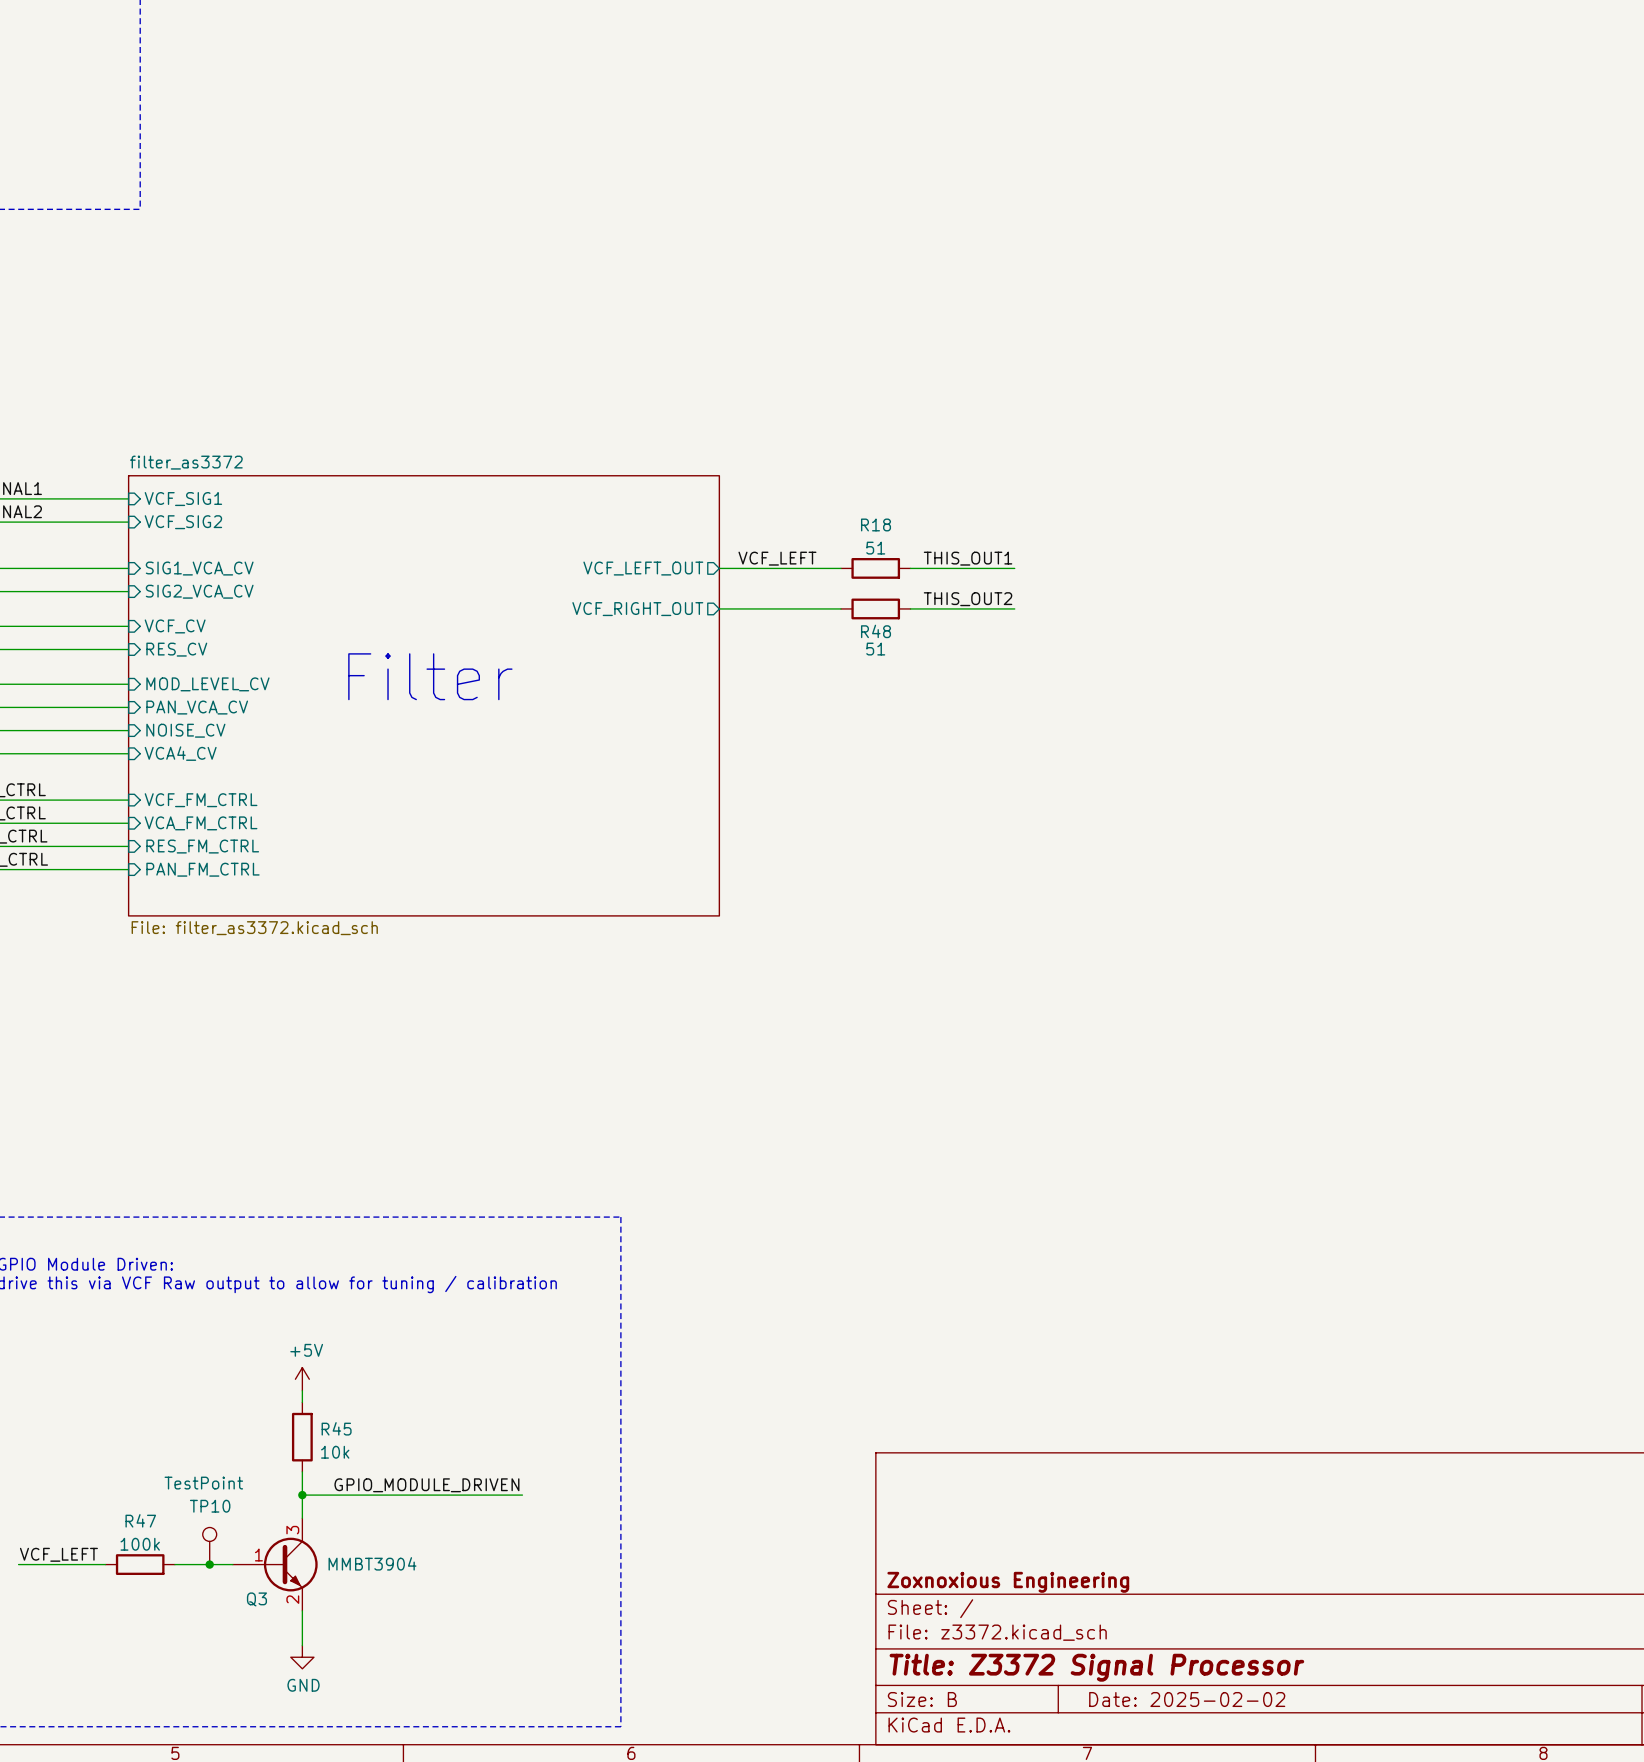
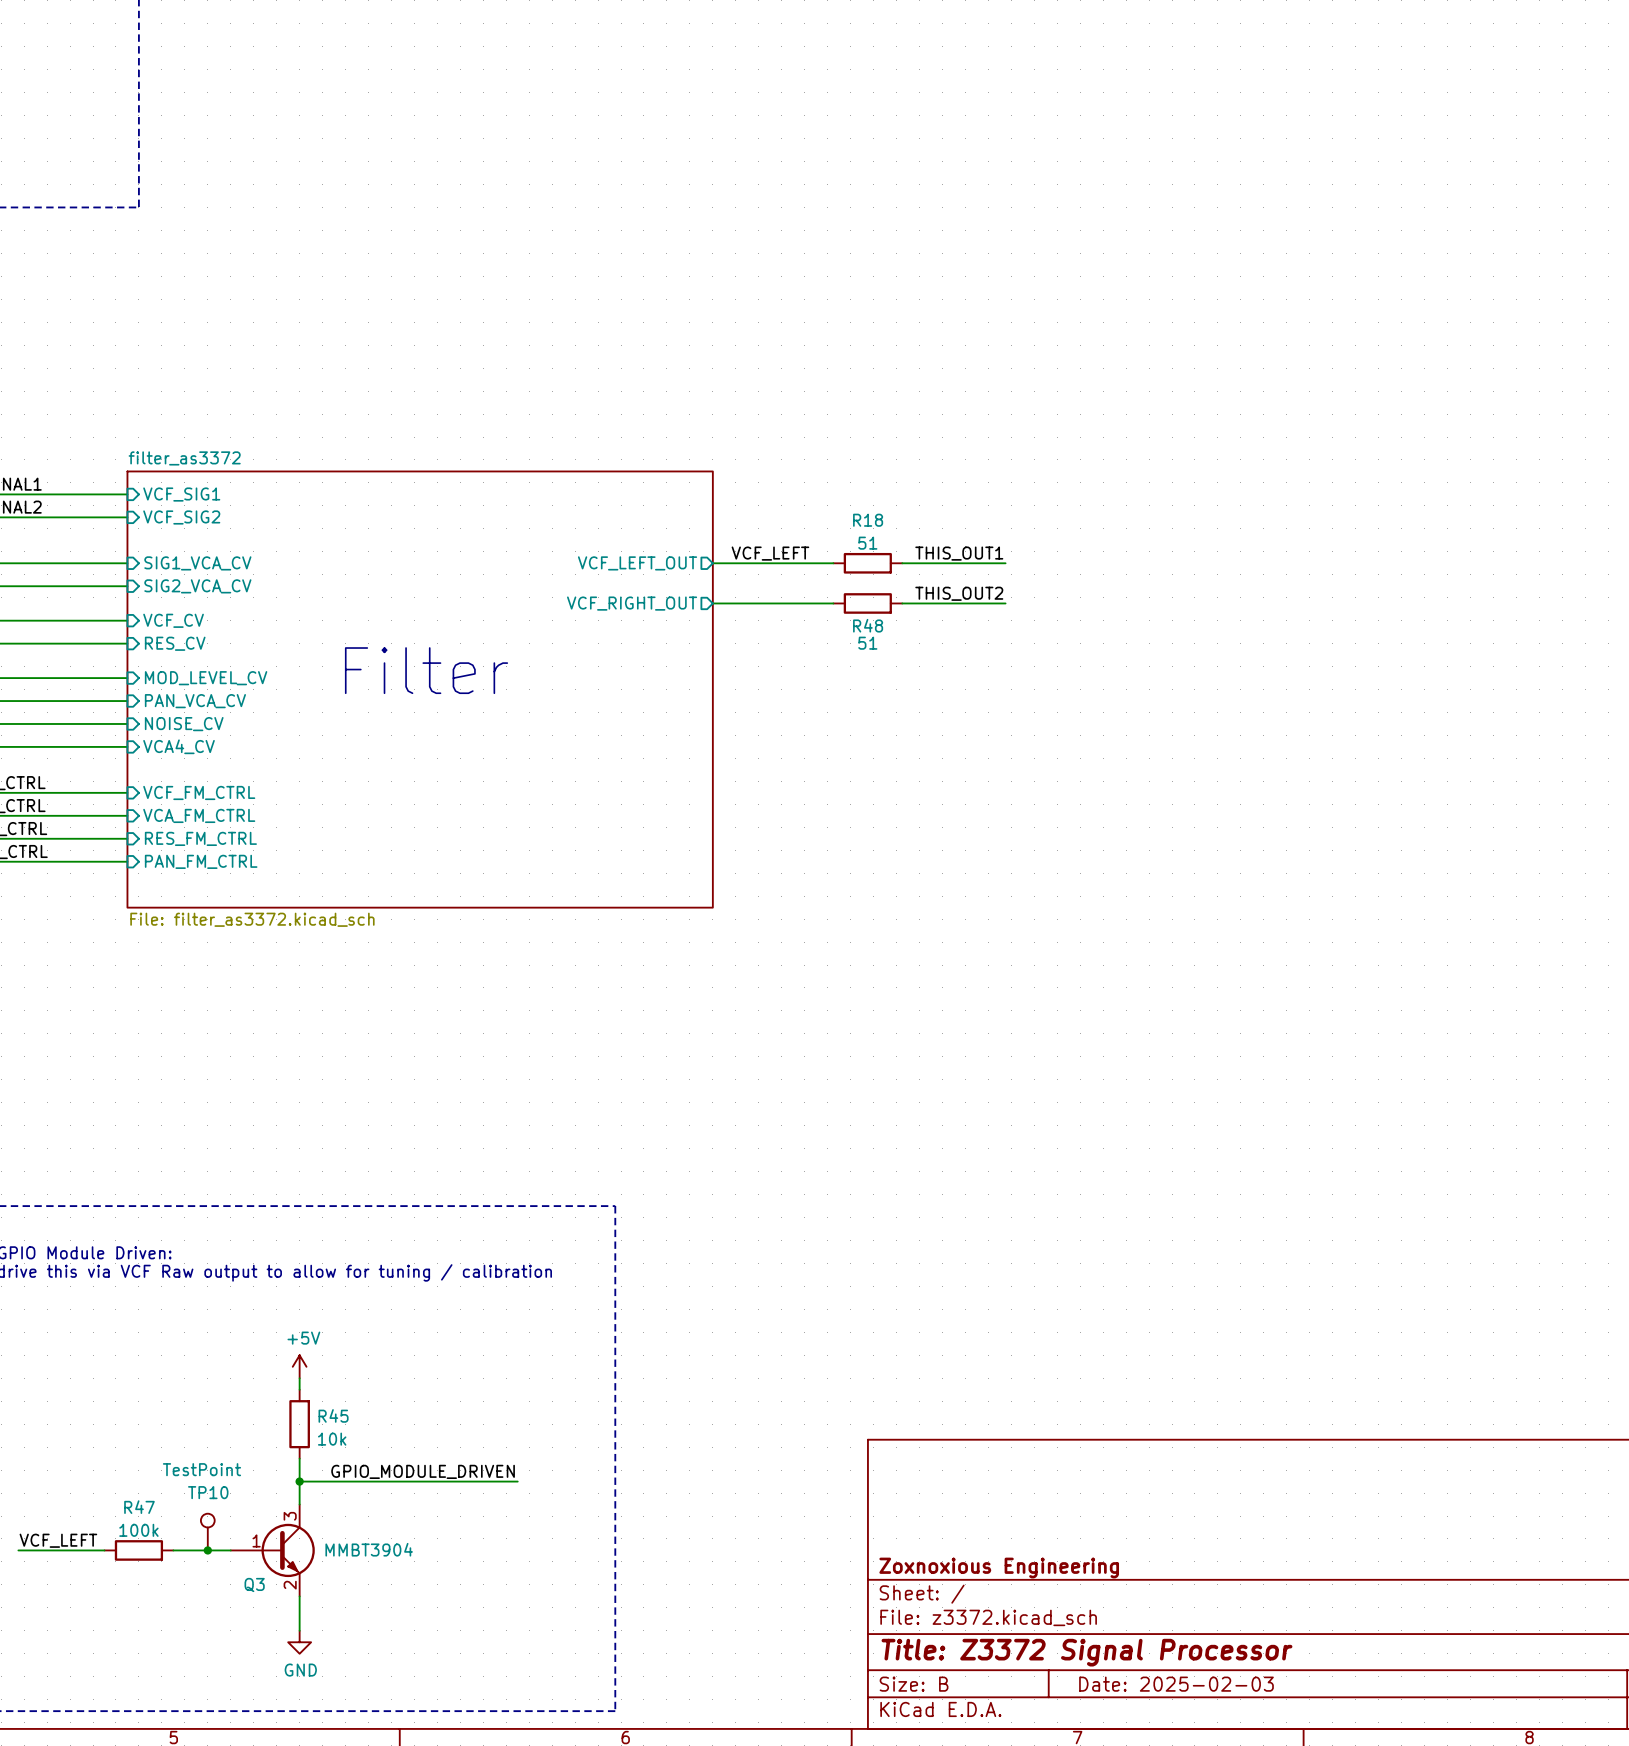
title block: Date: 2025-02-02 (1187, 1699) -> Date: 2025-02-03 (1176, 1684)

